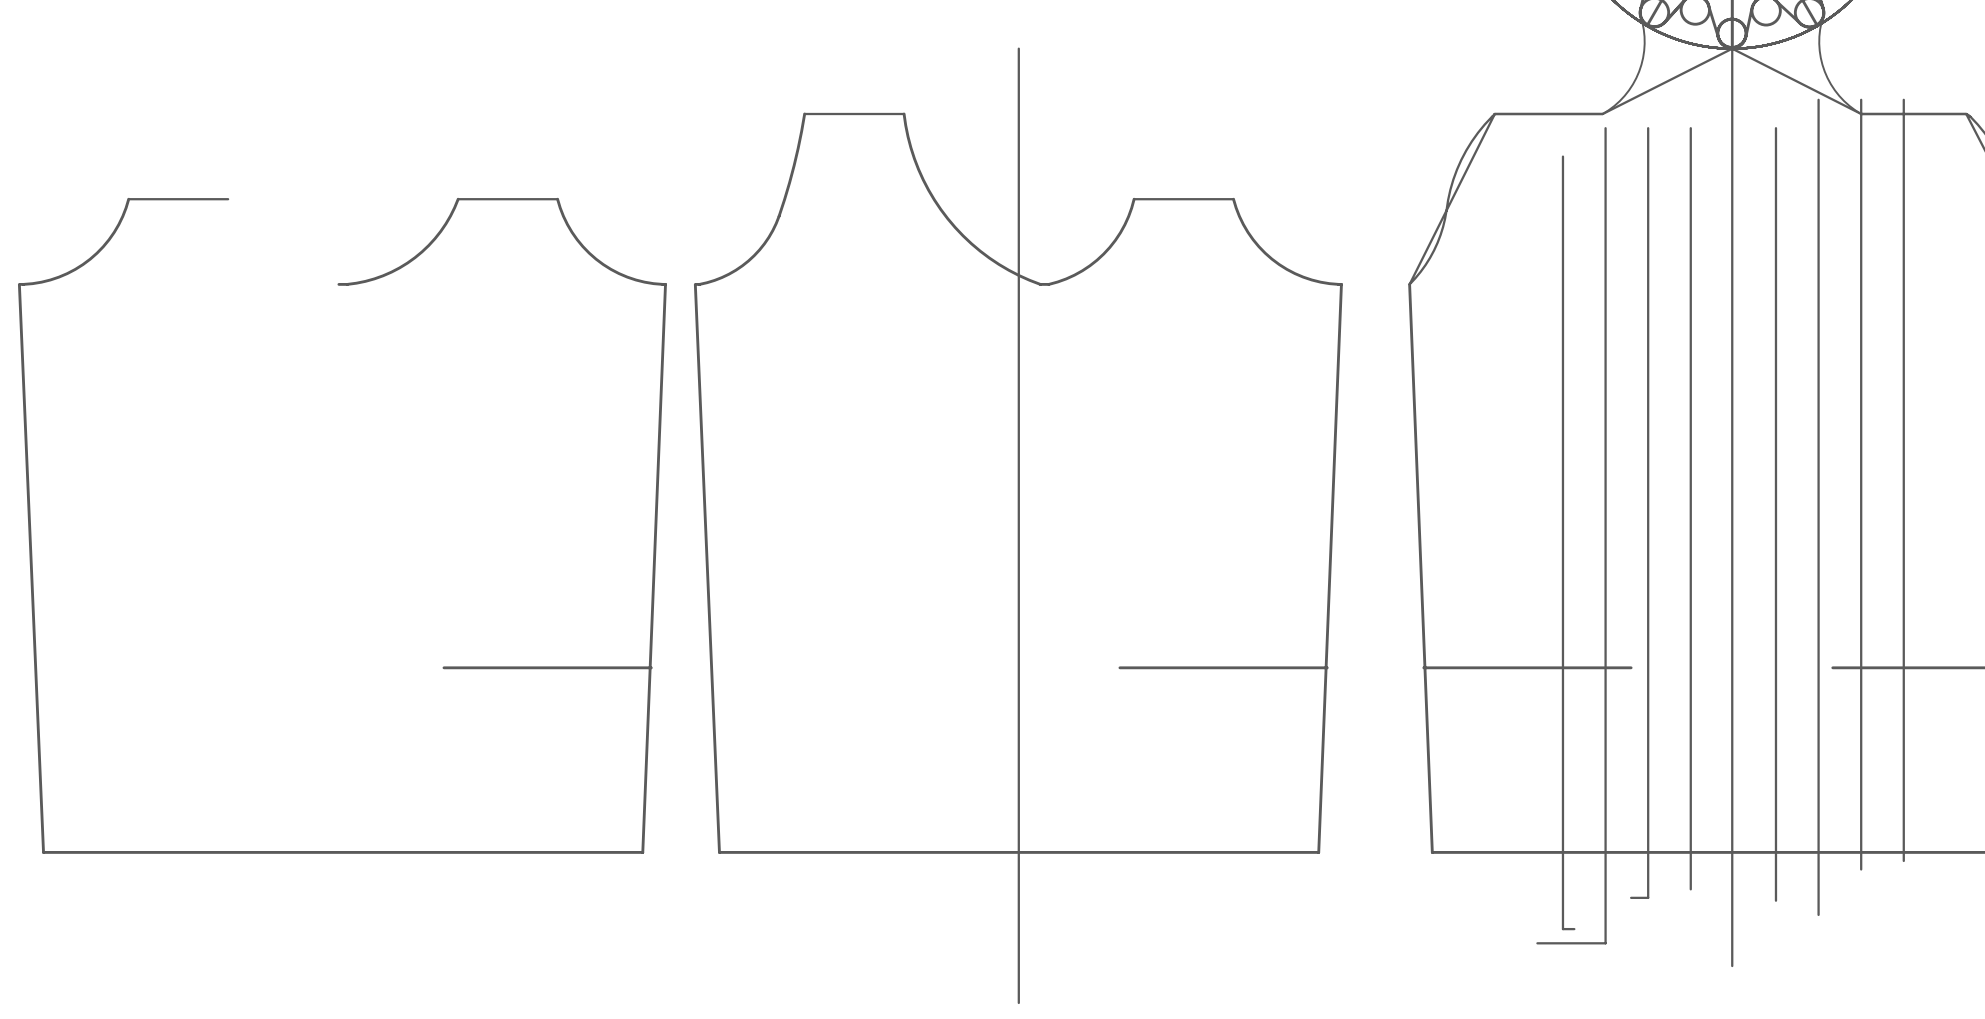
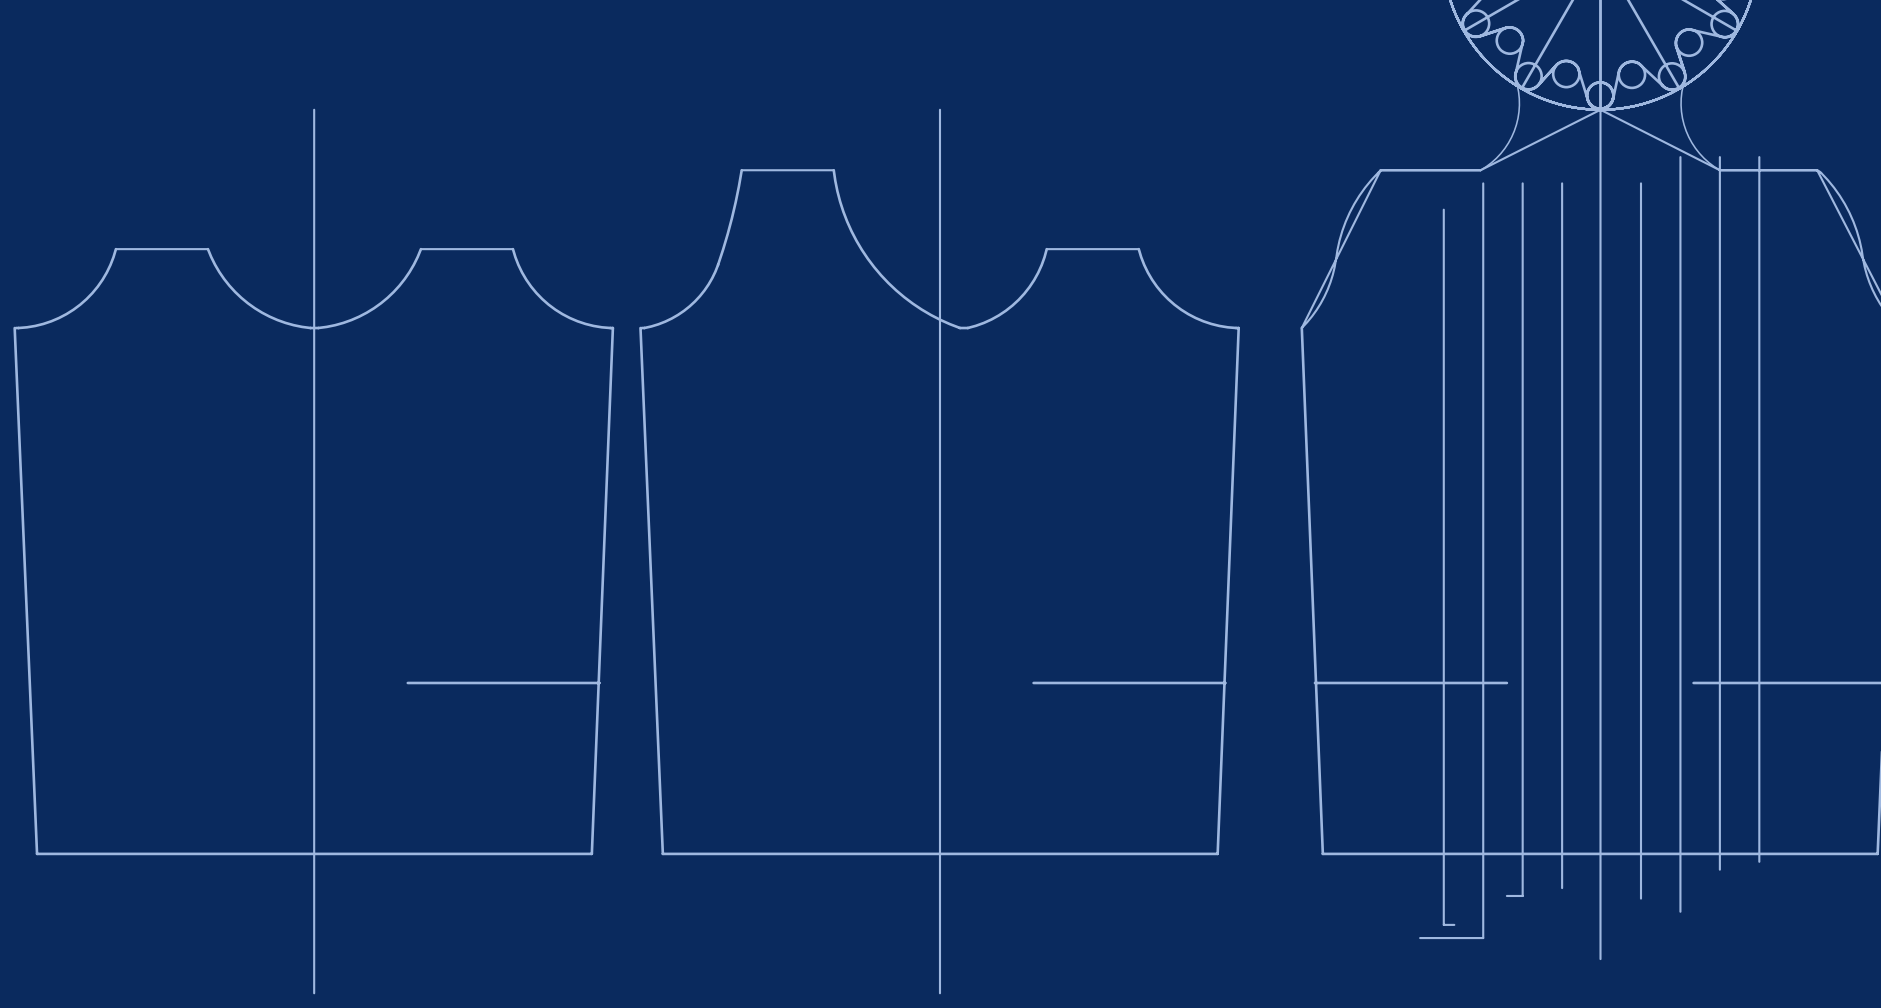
line: none -> (314, 109) (314, 993)
line: none -> (207, 249) (224, 279) (247, 303) (277, 320) (310, 328)

